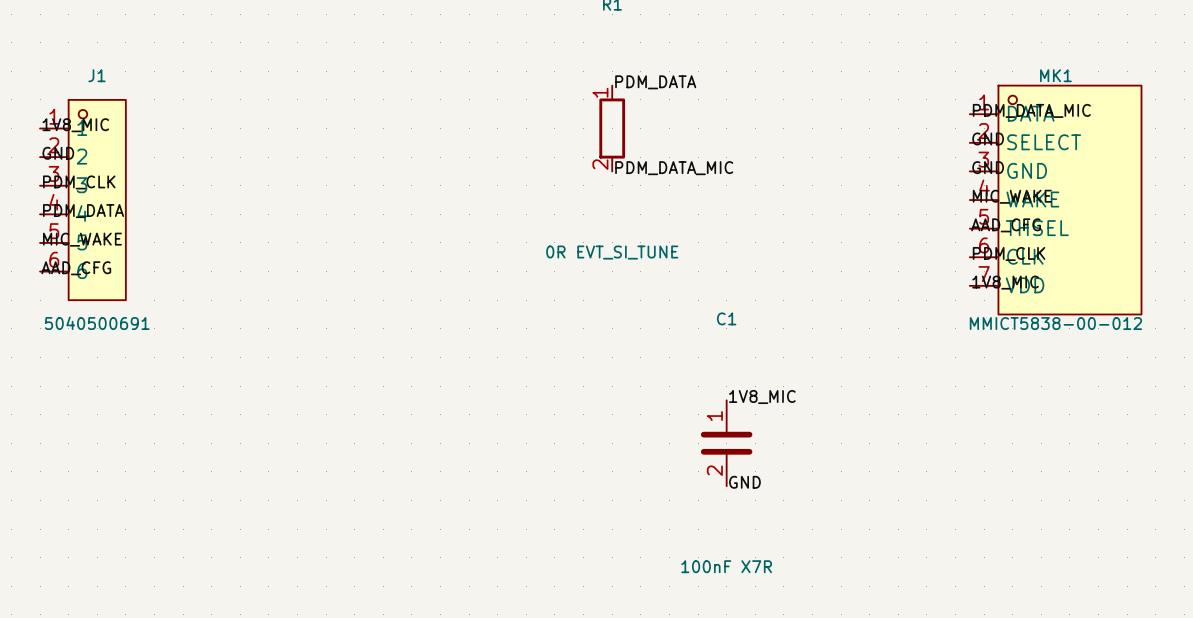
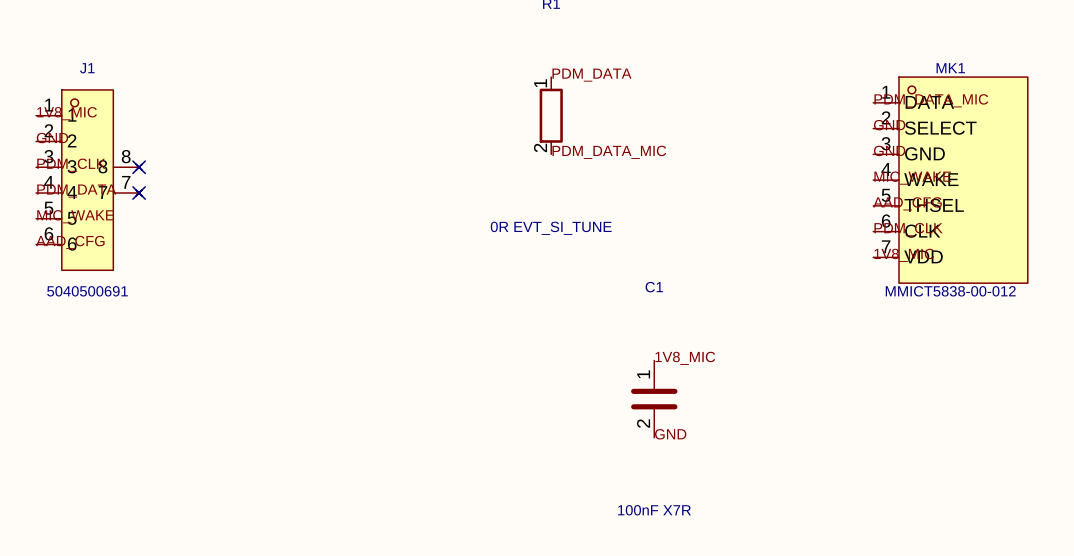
J1 symbol: [40, 99, 126, 301] -> [36, 89, 143, 271]
no-connect mark: none -> (139, 167)
no-connect mark: none -> (139, 193)

